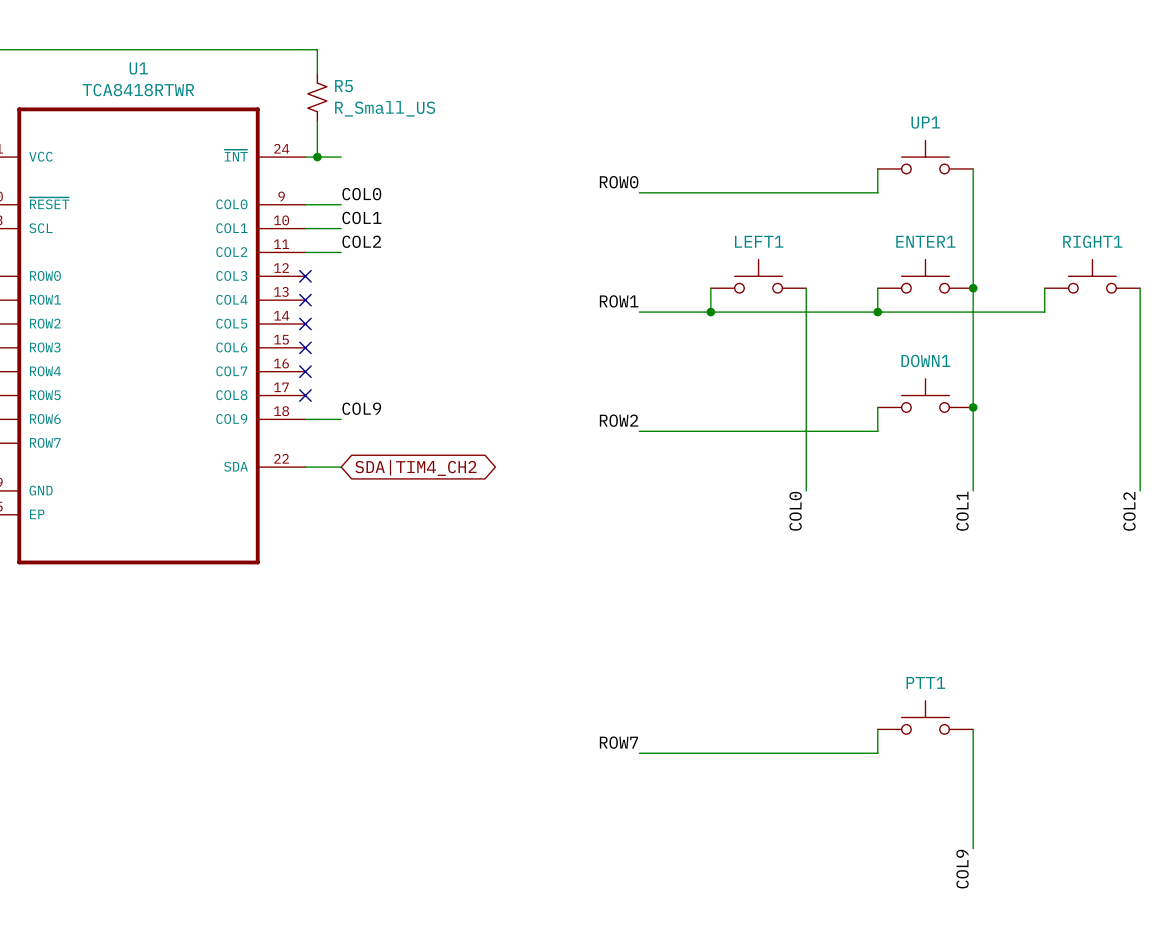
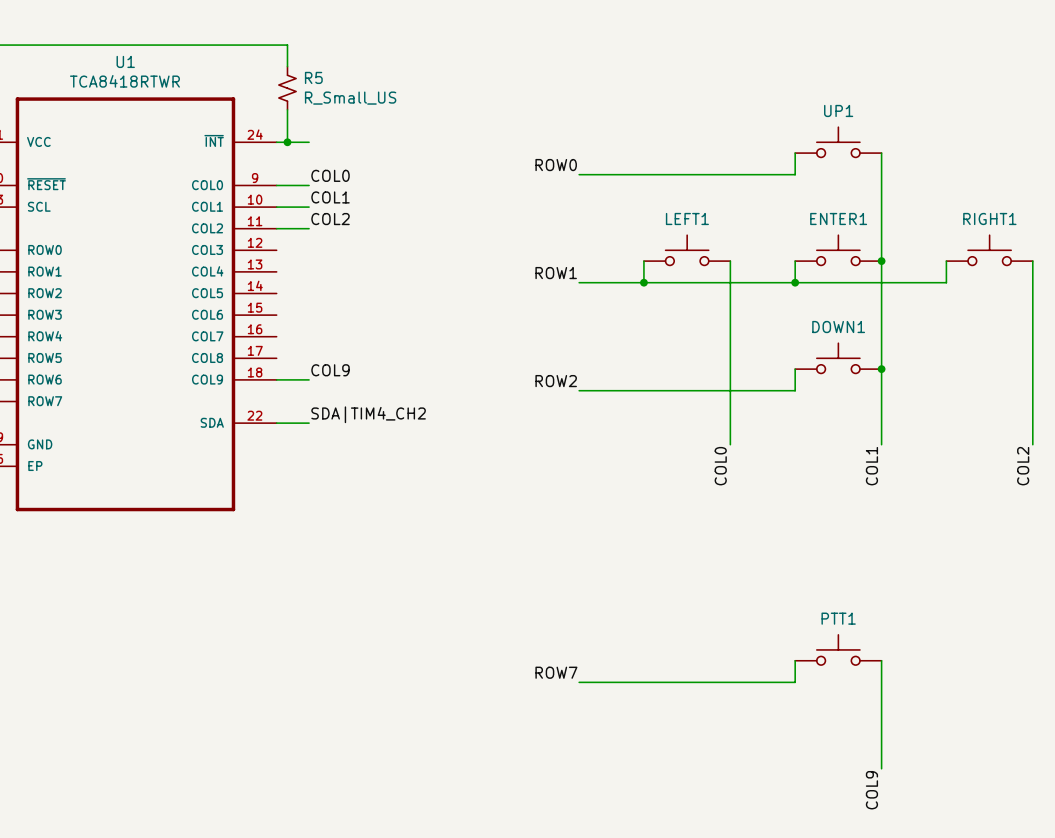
no-connect mark: (305, 276) -> none
no-connect mark: (305, 300) -> none
no-connect mark: (305, 323) -> none
no-connect mark: (305, 347) -> none
no-connect mark: (305, 371) -> none
no-connect mark: (305, 395) -> none
label: none -> SDA|TIM4_CH2 (368, 414)
global label: SDA|TIM4_CH2 (415, 468) -> none

